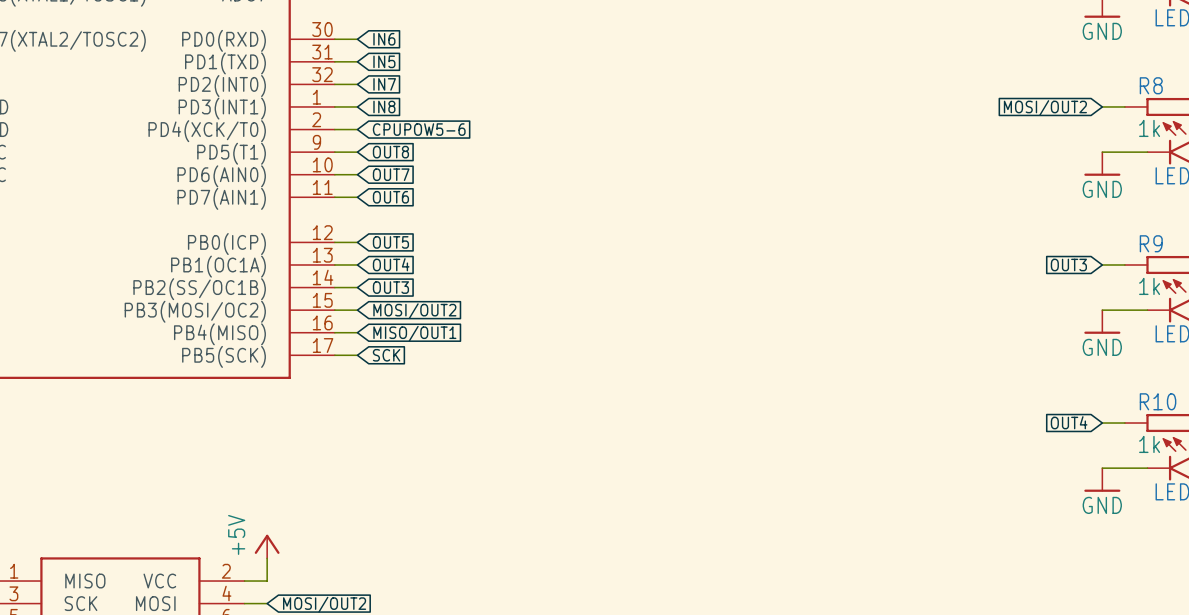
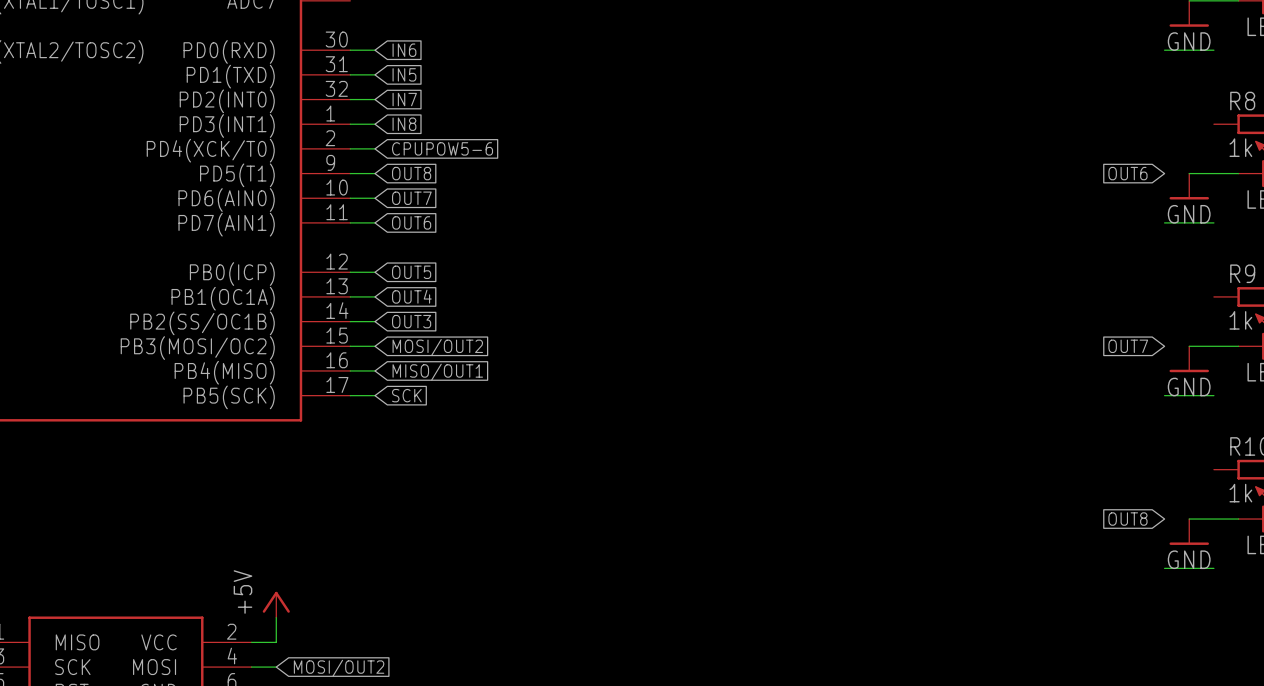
wire: none -> (1164, 50) (1213, 50)
wire: (1102, 106) (1124, 106) -> none
global label: MOSI/OUT2 (1045, 108) -> none
global label: none -> OUT6 (1127, 173)
wire: none -> (1164, 222) (1213, 222)
global label: OUT3 (1068, 264) -> none
wire: (1102, 264) (1124, 264) -> none
global label: none -> OUT7 (1128, 346)
wire: none -> (1164, 395) (1213, 395)
global label: OUT4 (1069, 422) -> none
wire: (1102, 423) (1124, 423) -> none
global label: none -> OUT8 (1127, 519)
wire: none -> (1164, 568) (1213, 568)

